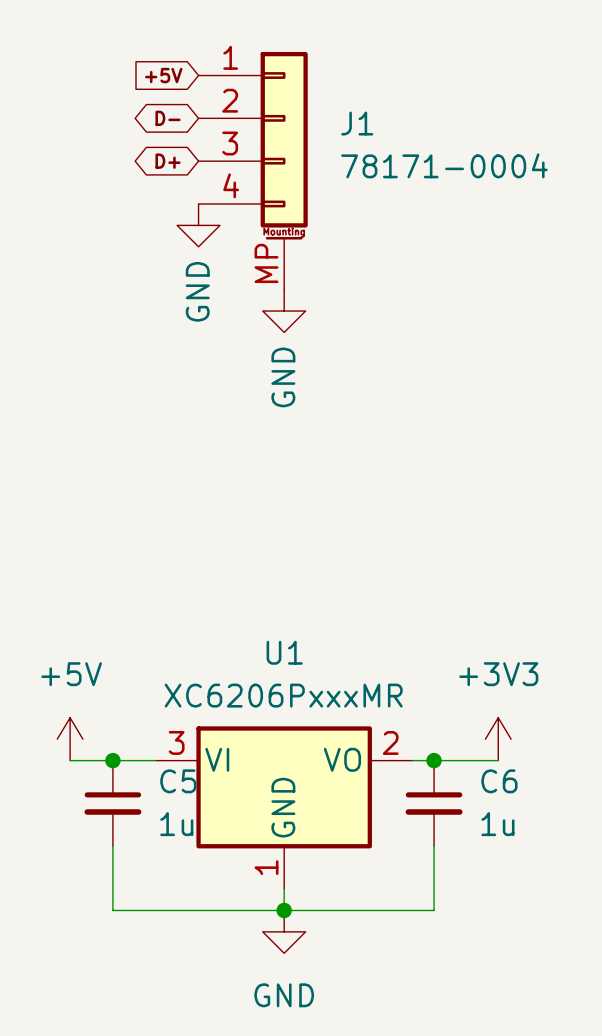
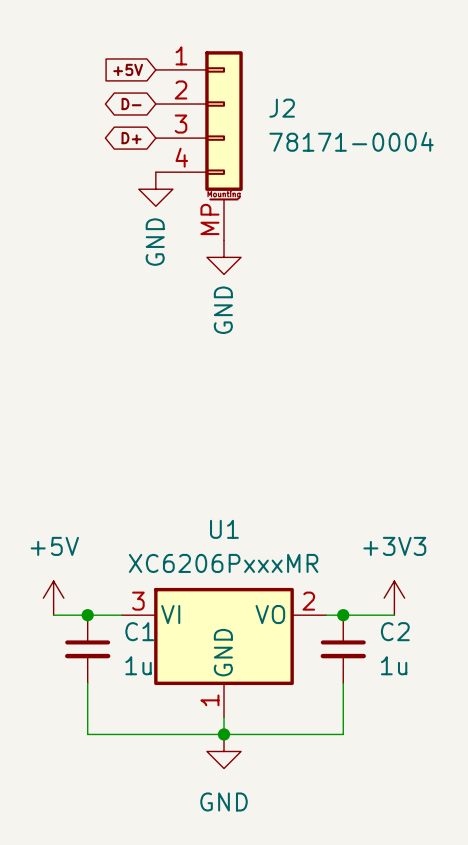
J1 name: J1 (357, 123) -> J2 (282, 108)
C5 name: C5 (178, 781) -> C1 (139, 631)
C6 name: C6 (499, 781) -> C2 (395, 631)

